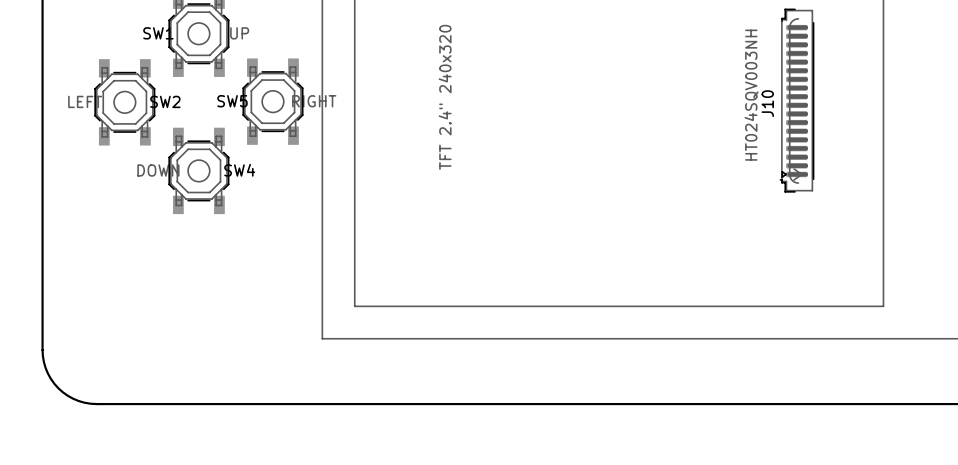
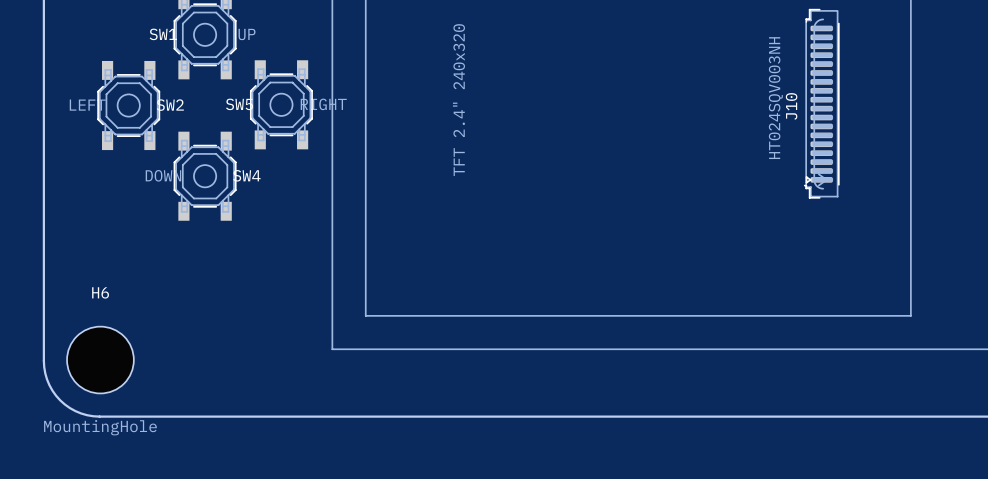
H6: none -> MountingHole (100, 360)

